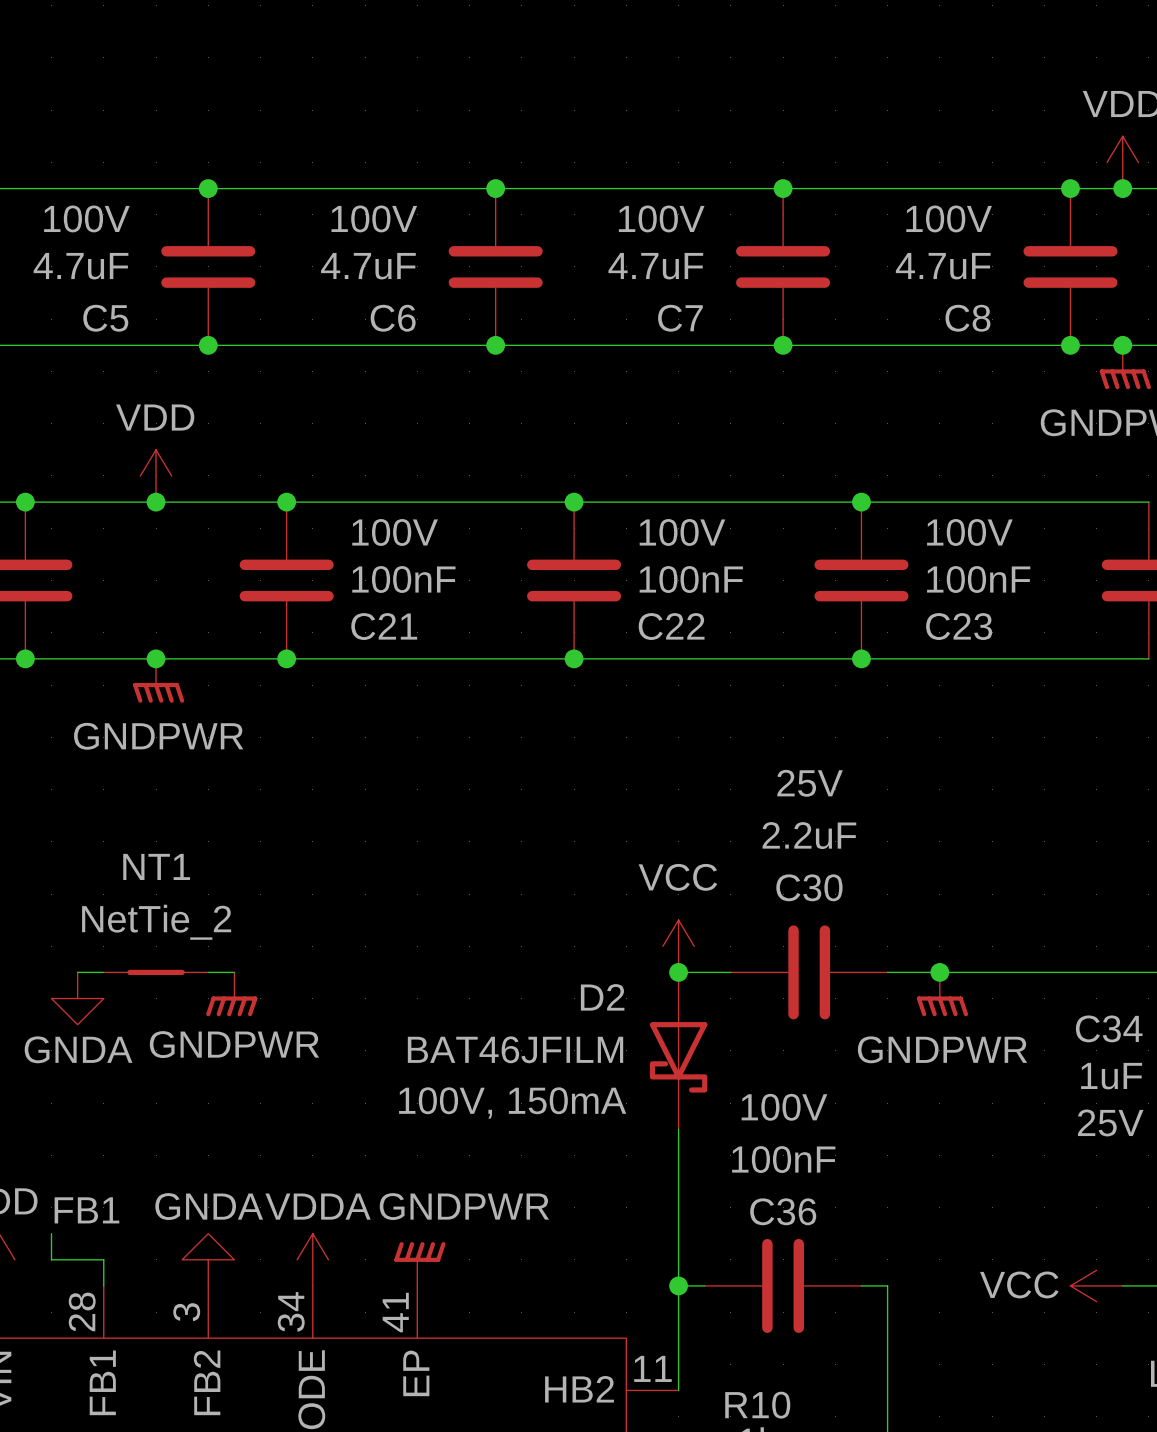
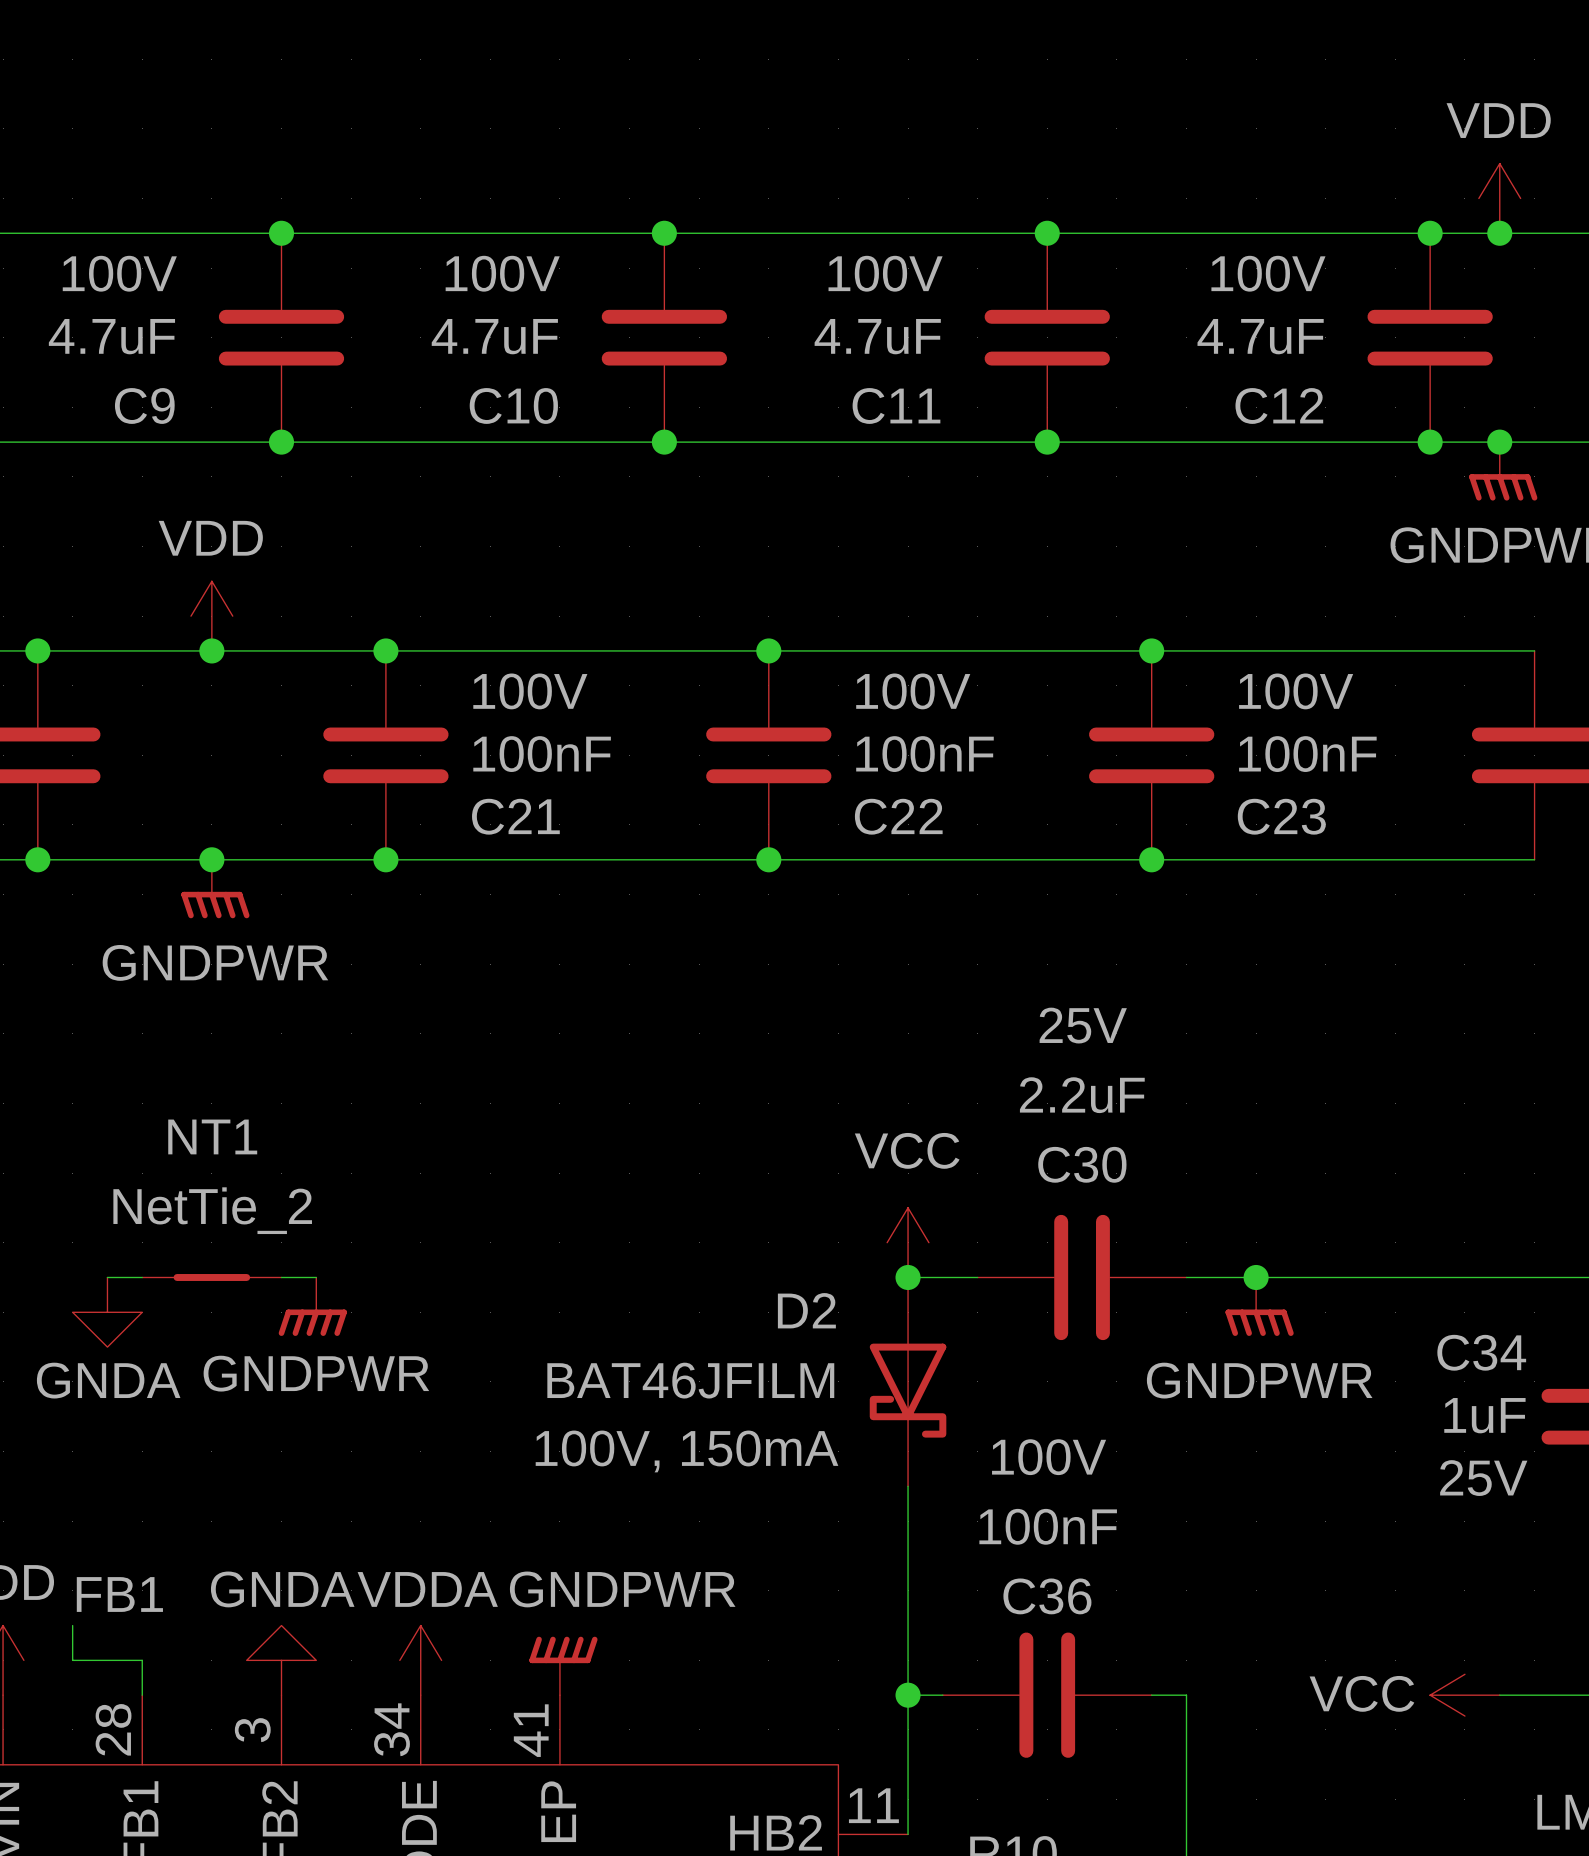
C5 name: C5 (105, 318) -> C9 (144, 405)
C6 name: C6 (393, 318) -> C10 (513, 405)
C7 name: C7 (680, 318) -> C11 (896, 405)
C8 name: C8 (967, 318) -> C12 (1279, 405)

